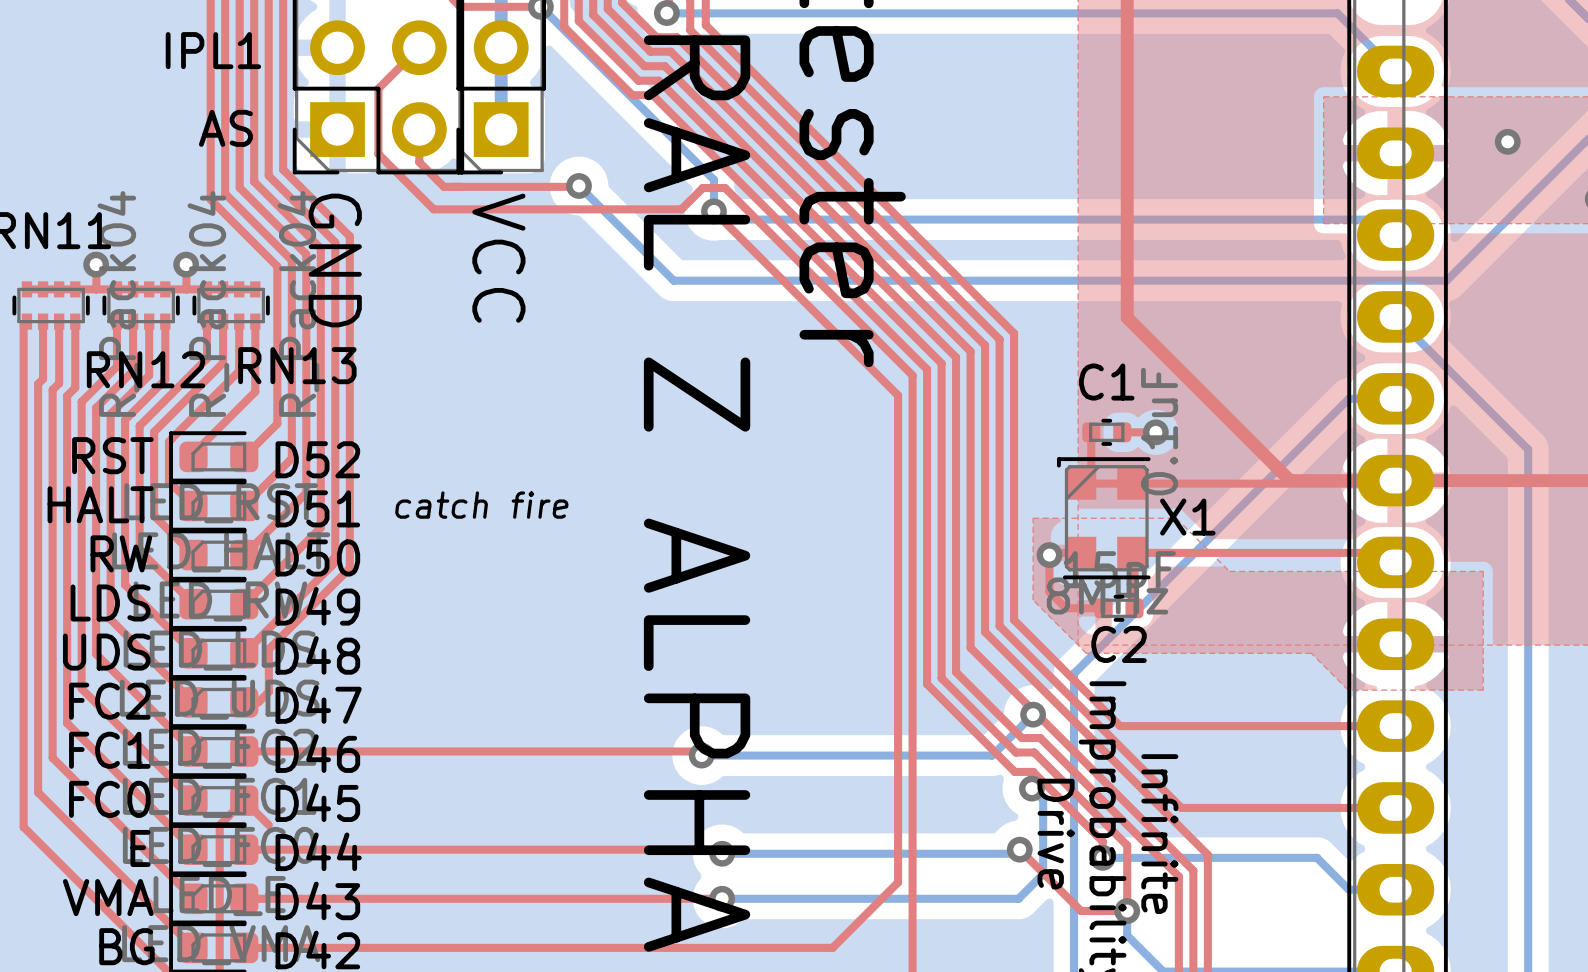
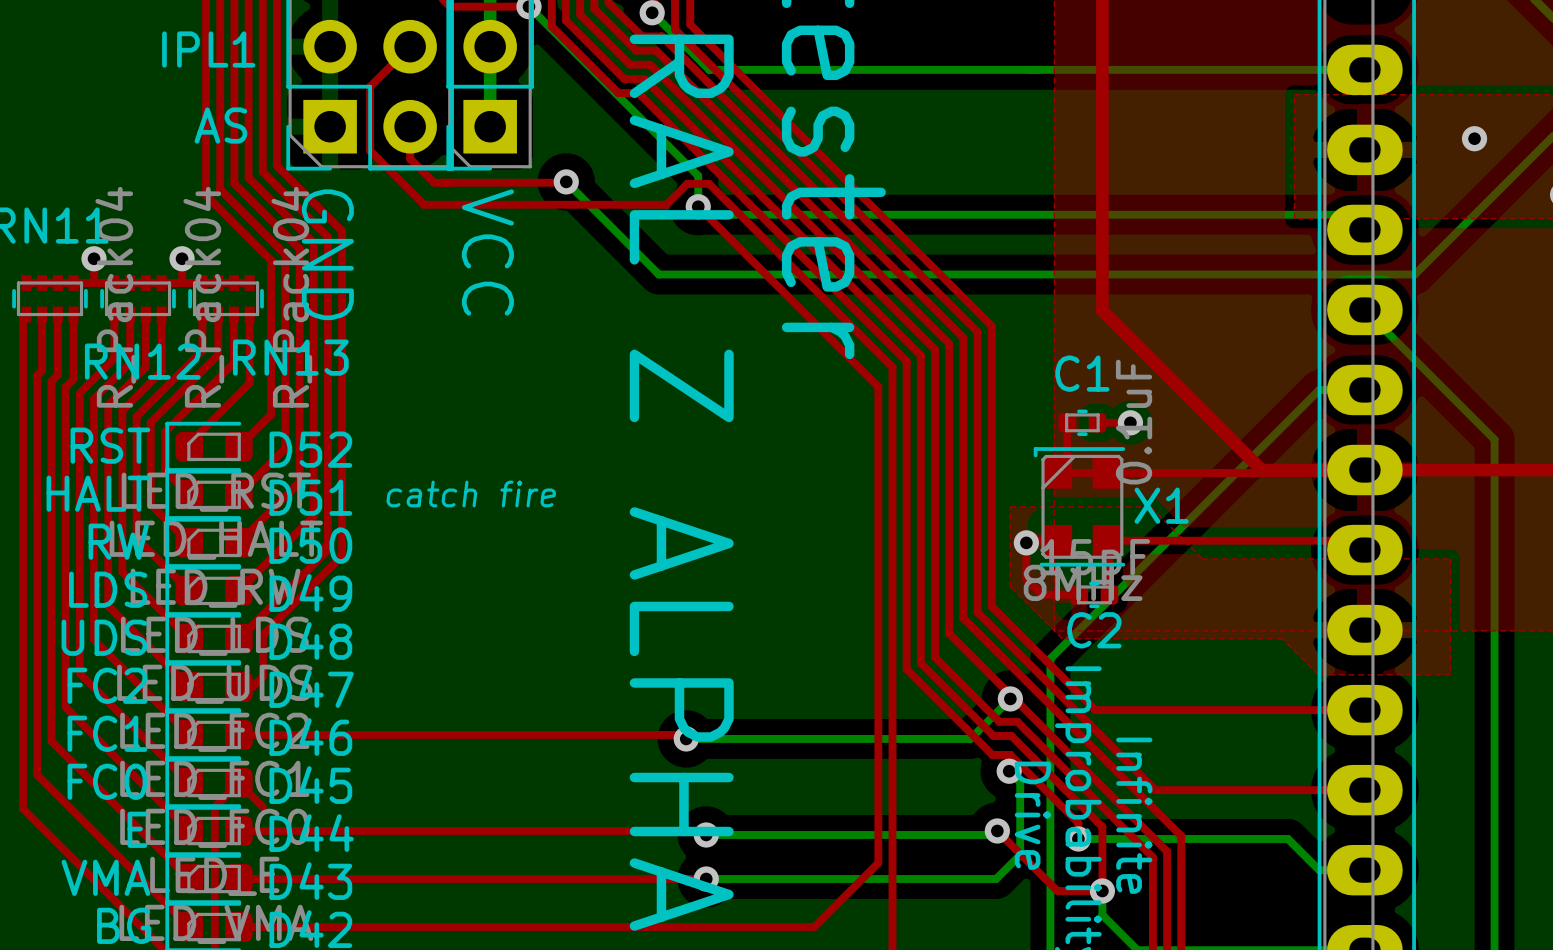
bottom track: (667, 13) (1337, 13) (1394, 72) -> (652, 13) (709, 69) (1364, 69)

